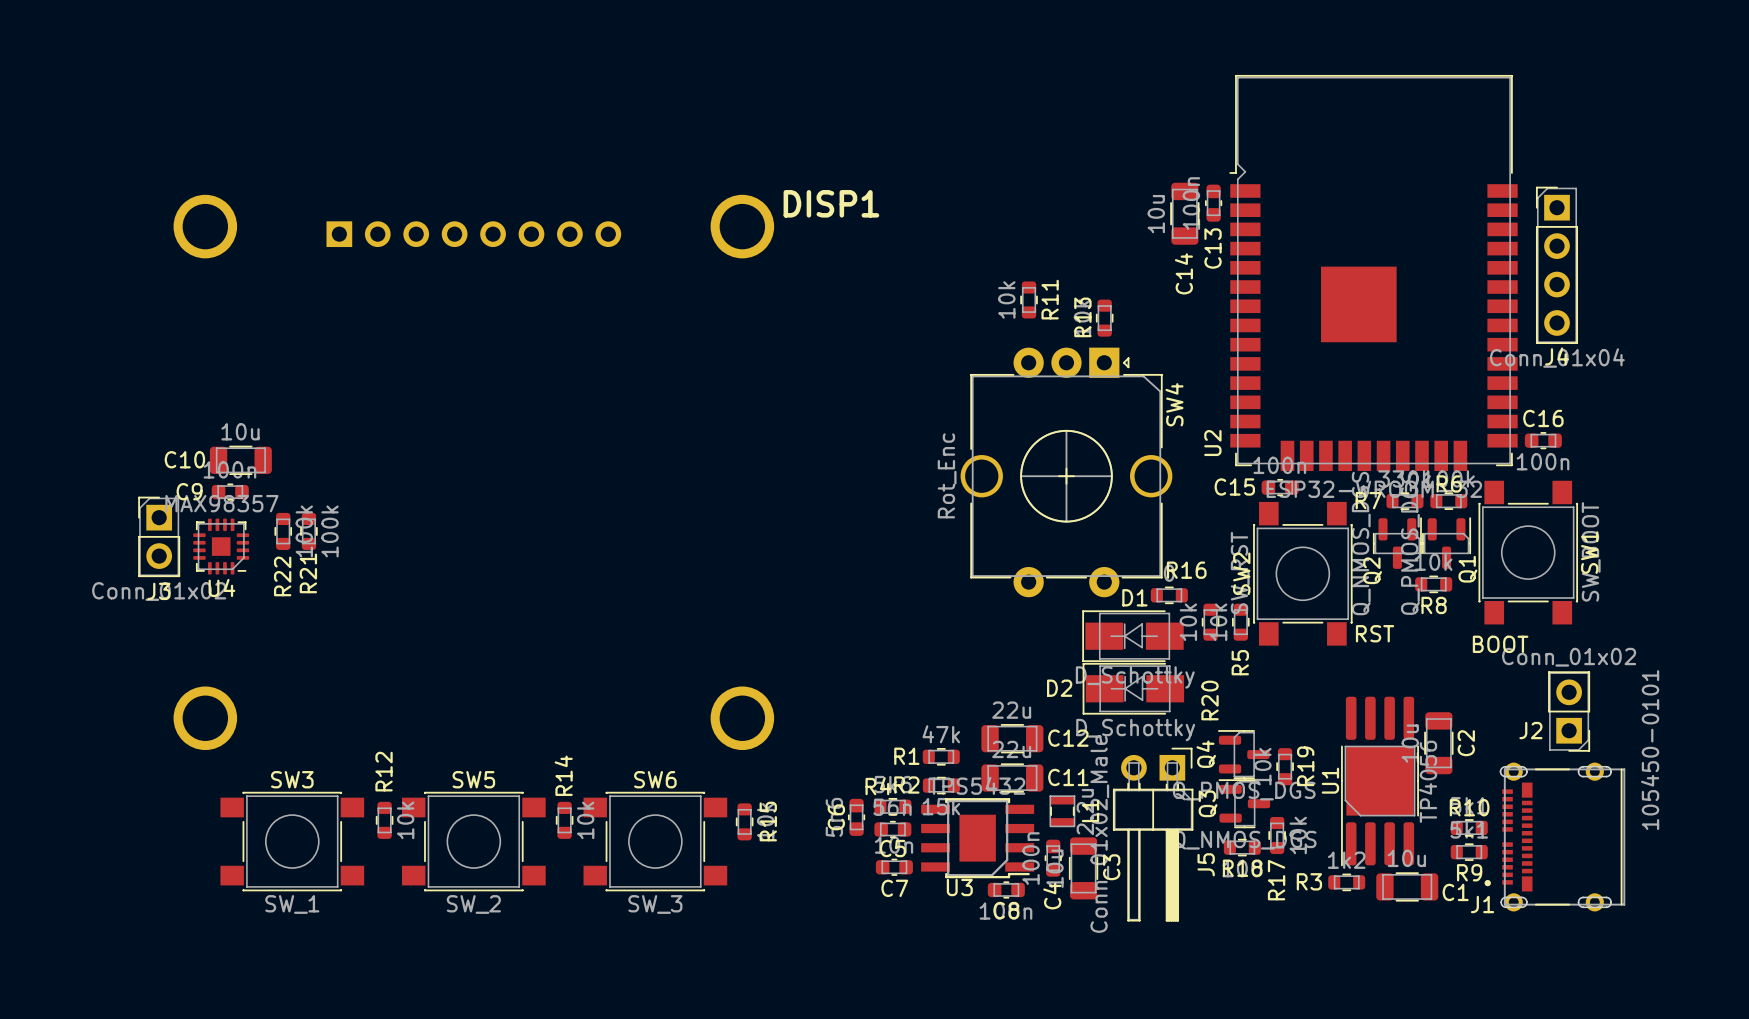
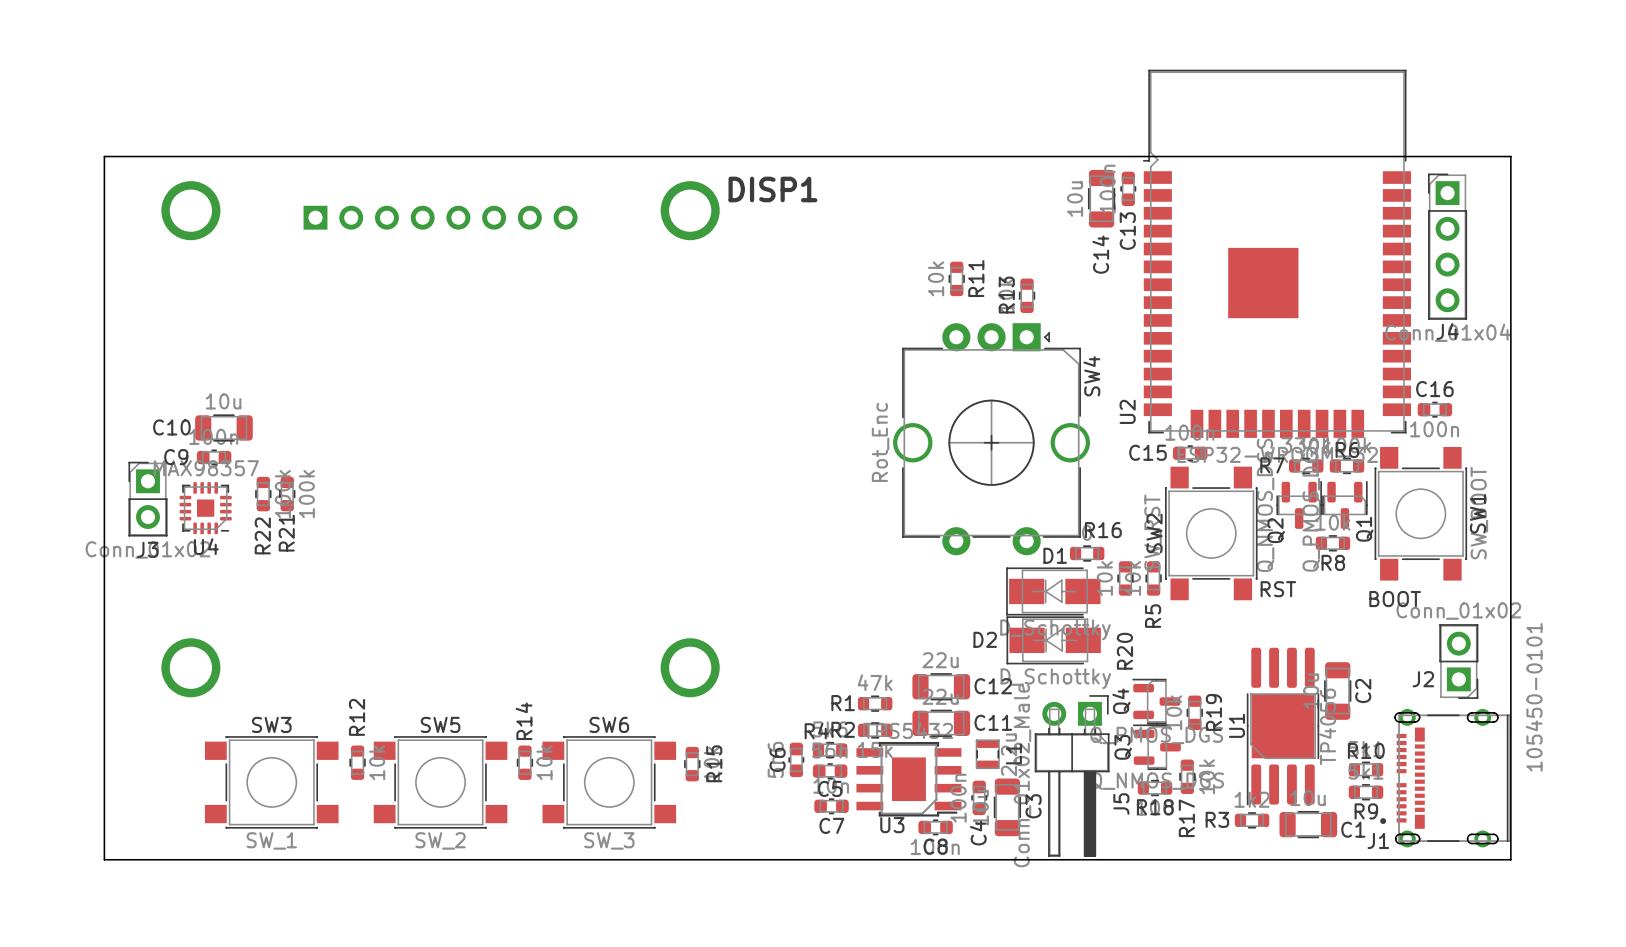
board edge: none -> (104, 156) (1510, 156) (1510, 859) (104, 859) (104, 156)

